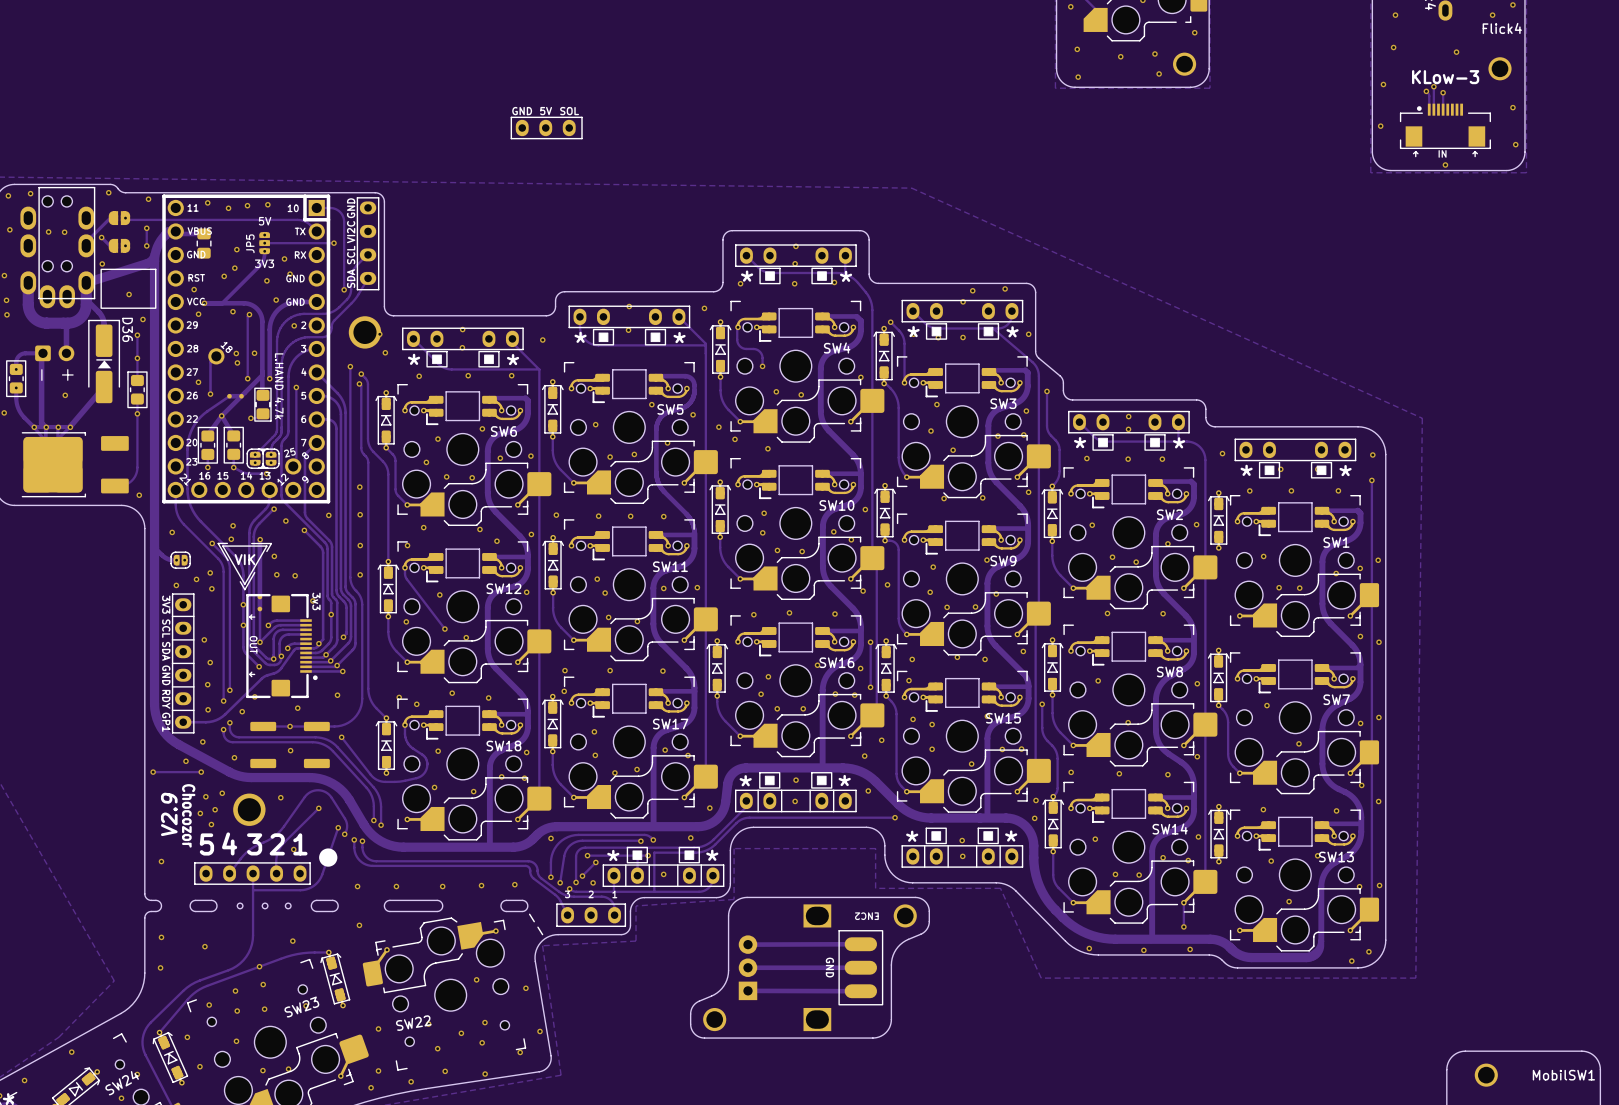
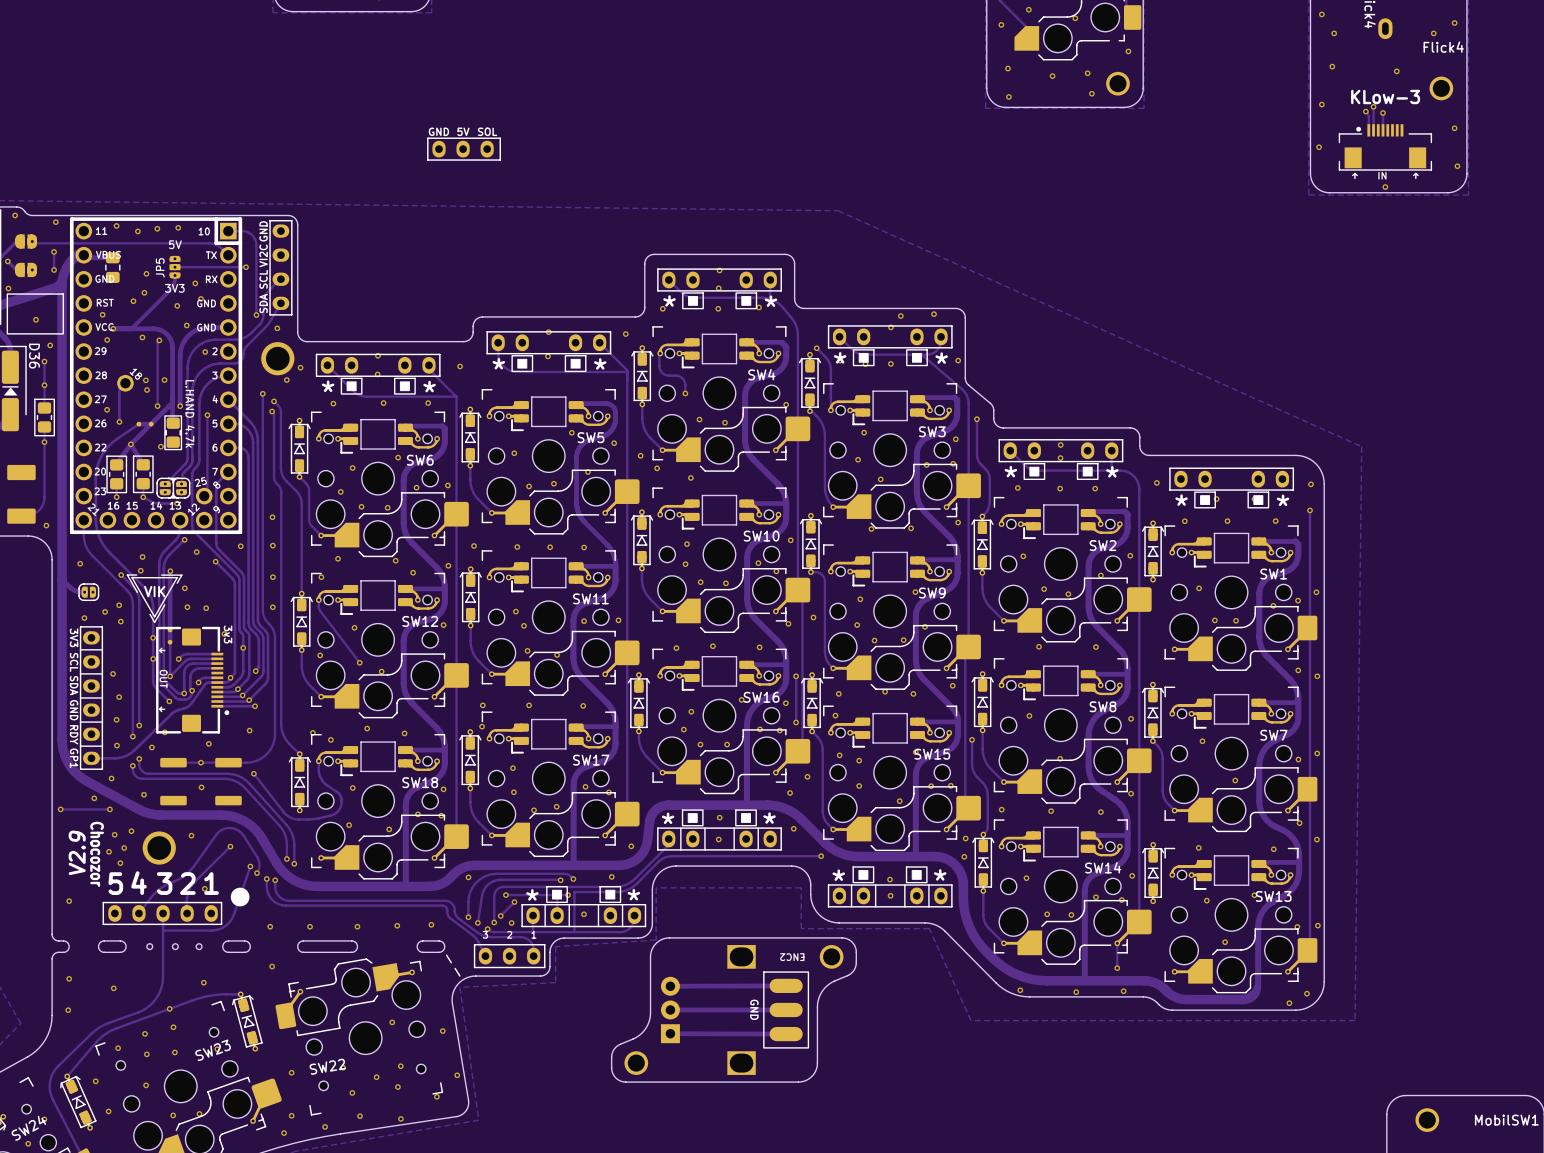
via: none -> (277, 328)
via: (379, 334) -> none
via: none -> (300, 367)
via: (385, 352) -> none
via: none -> (286, 380)

